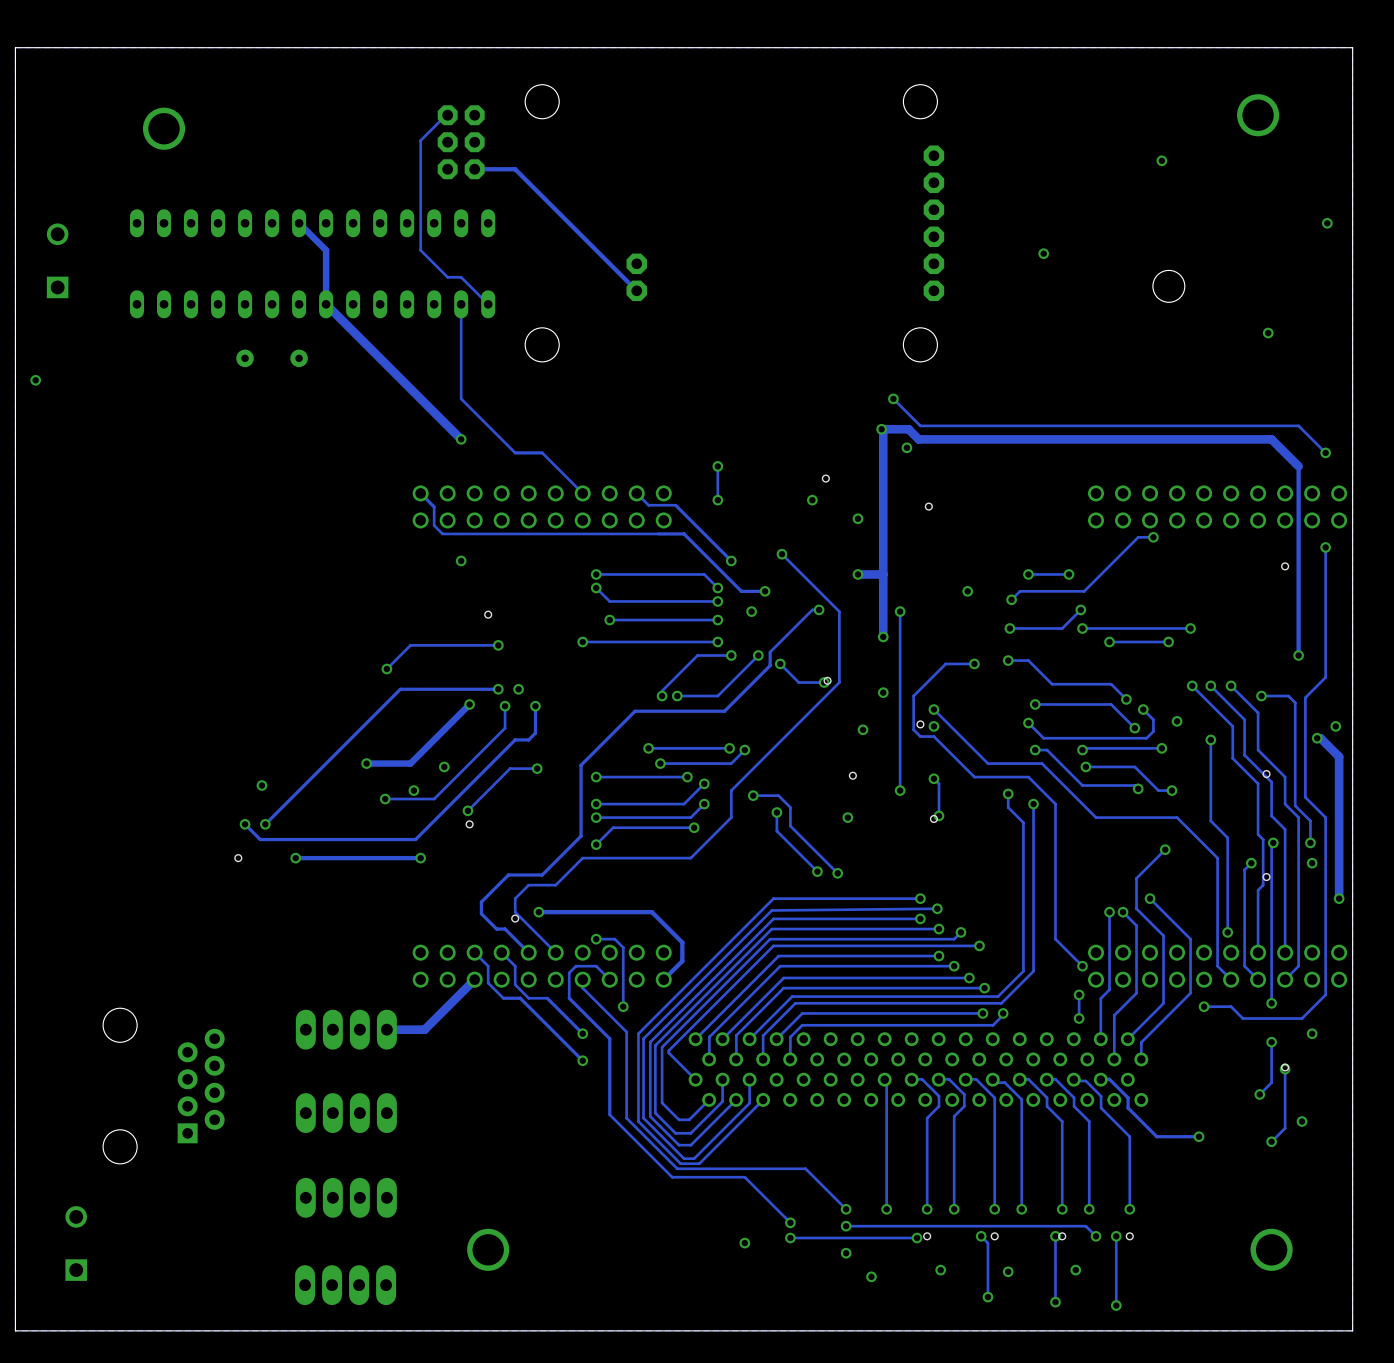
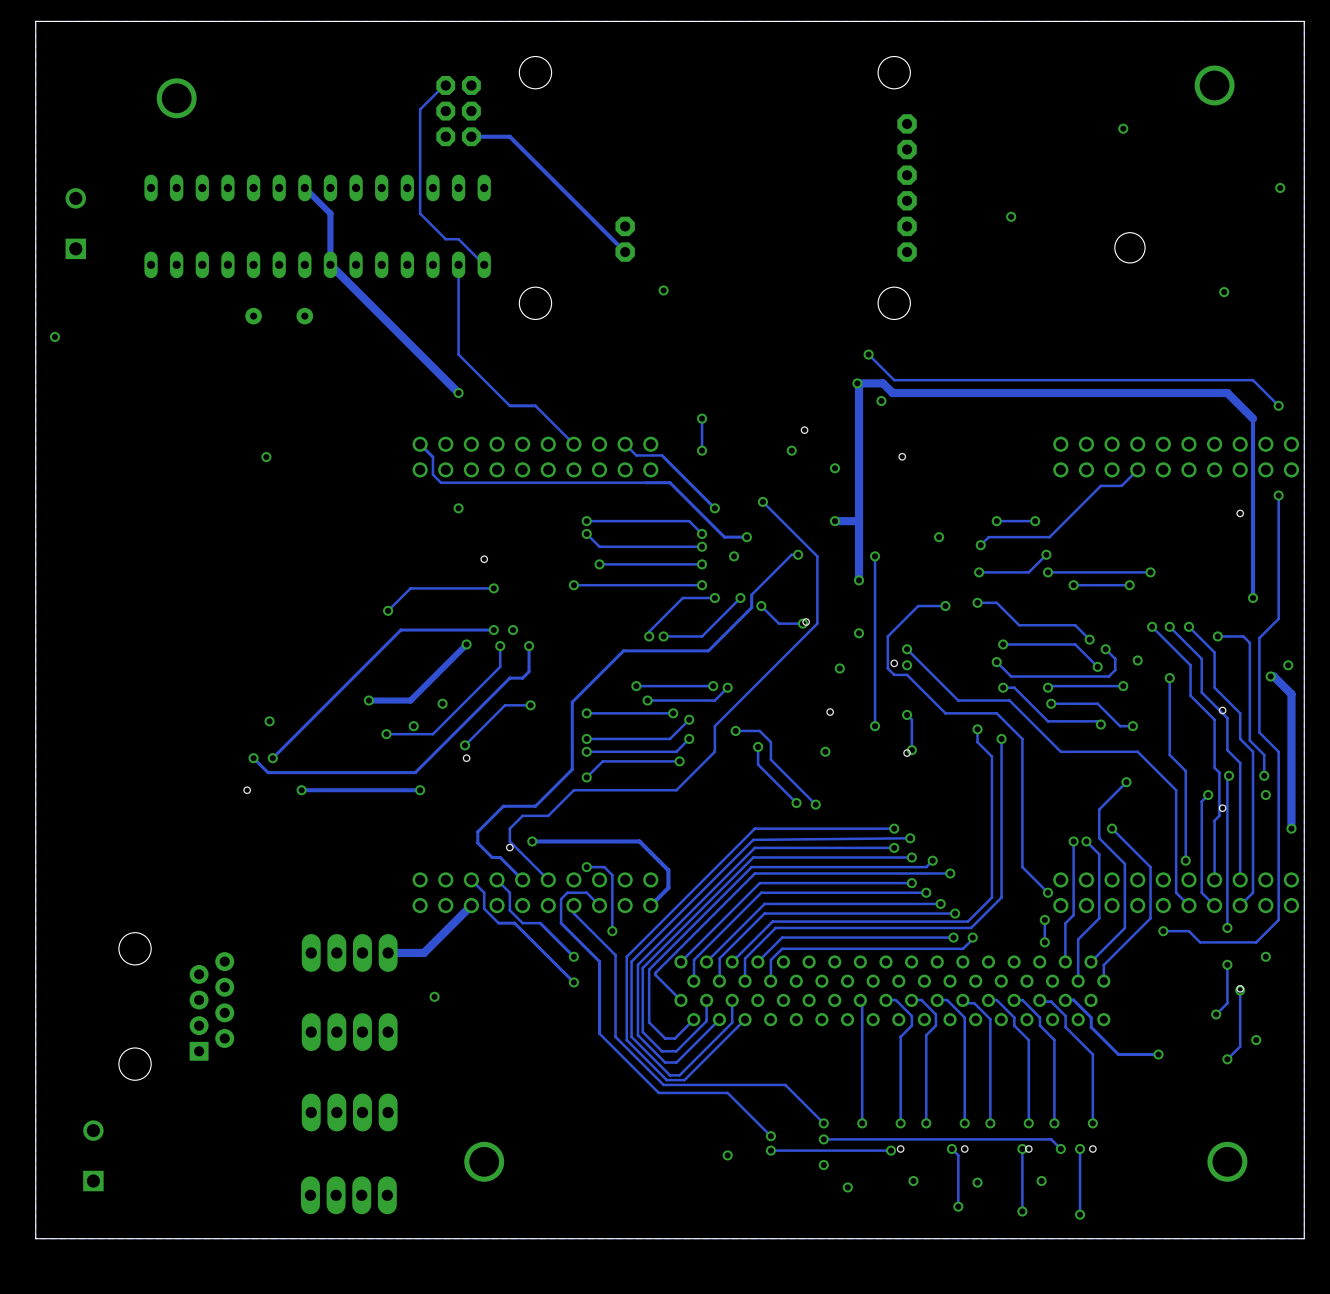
via: none -> (663, 290)
via: none -> (266, 457)
track: none -> (1137, 469) (1121, 485) (1115, 485)
via: (1153, 537) -> none
via: none -> (434, 996)

